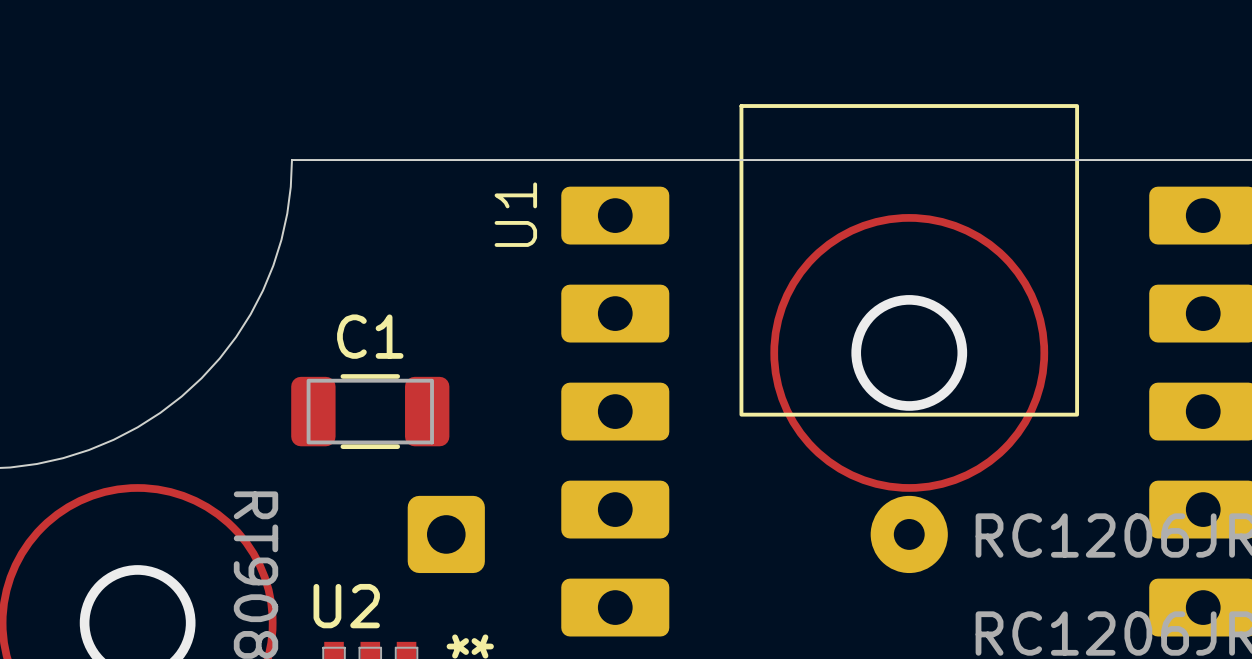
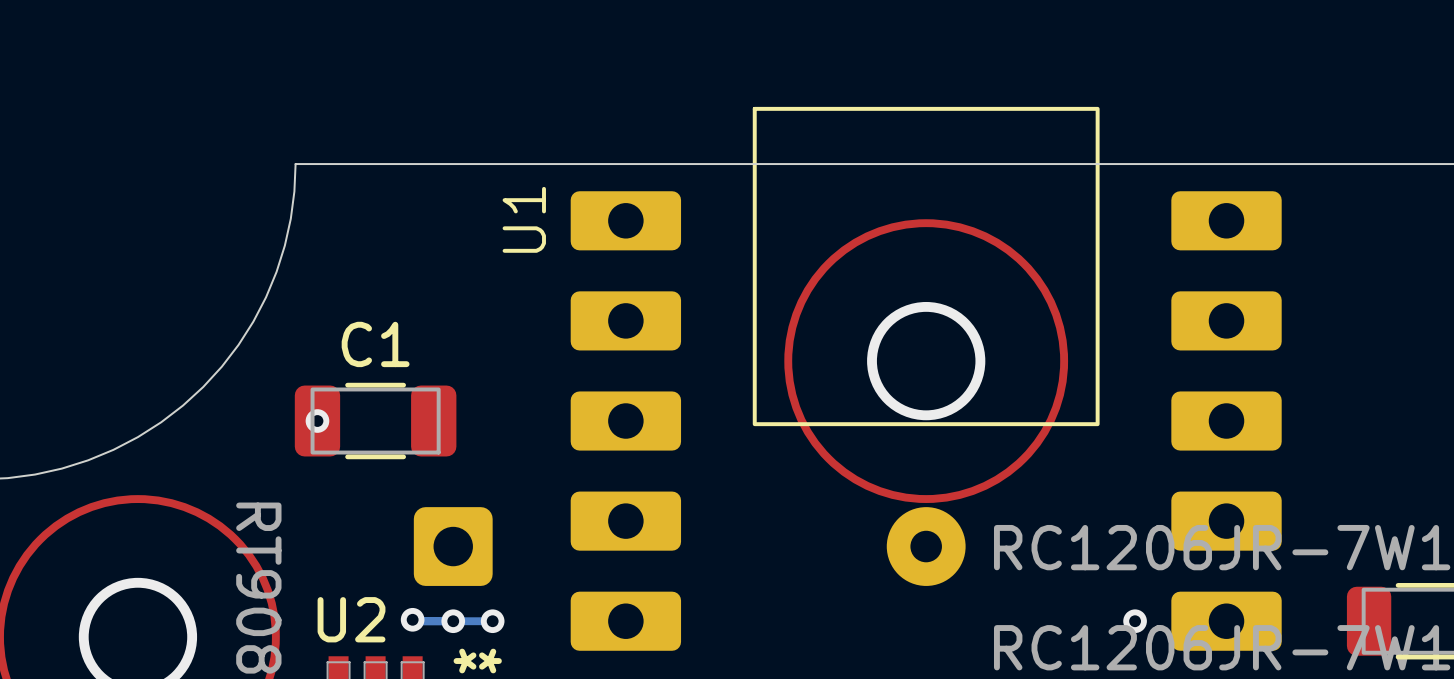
via: none -> (317, 421)
via: none -> (412, 619)
bottom track: none -> (413, 621) (492, 621)
via: none -> (453, 621)
via: none -> (492, 621)
via: none -> (1135, 621)

